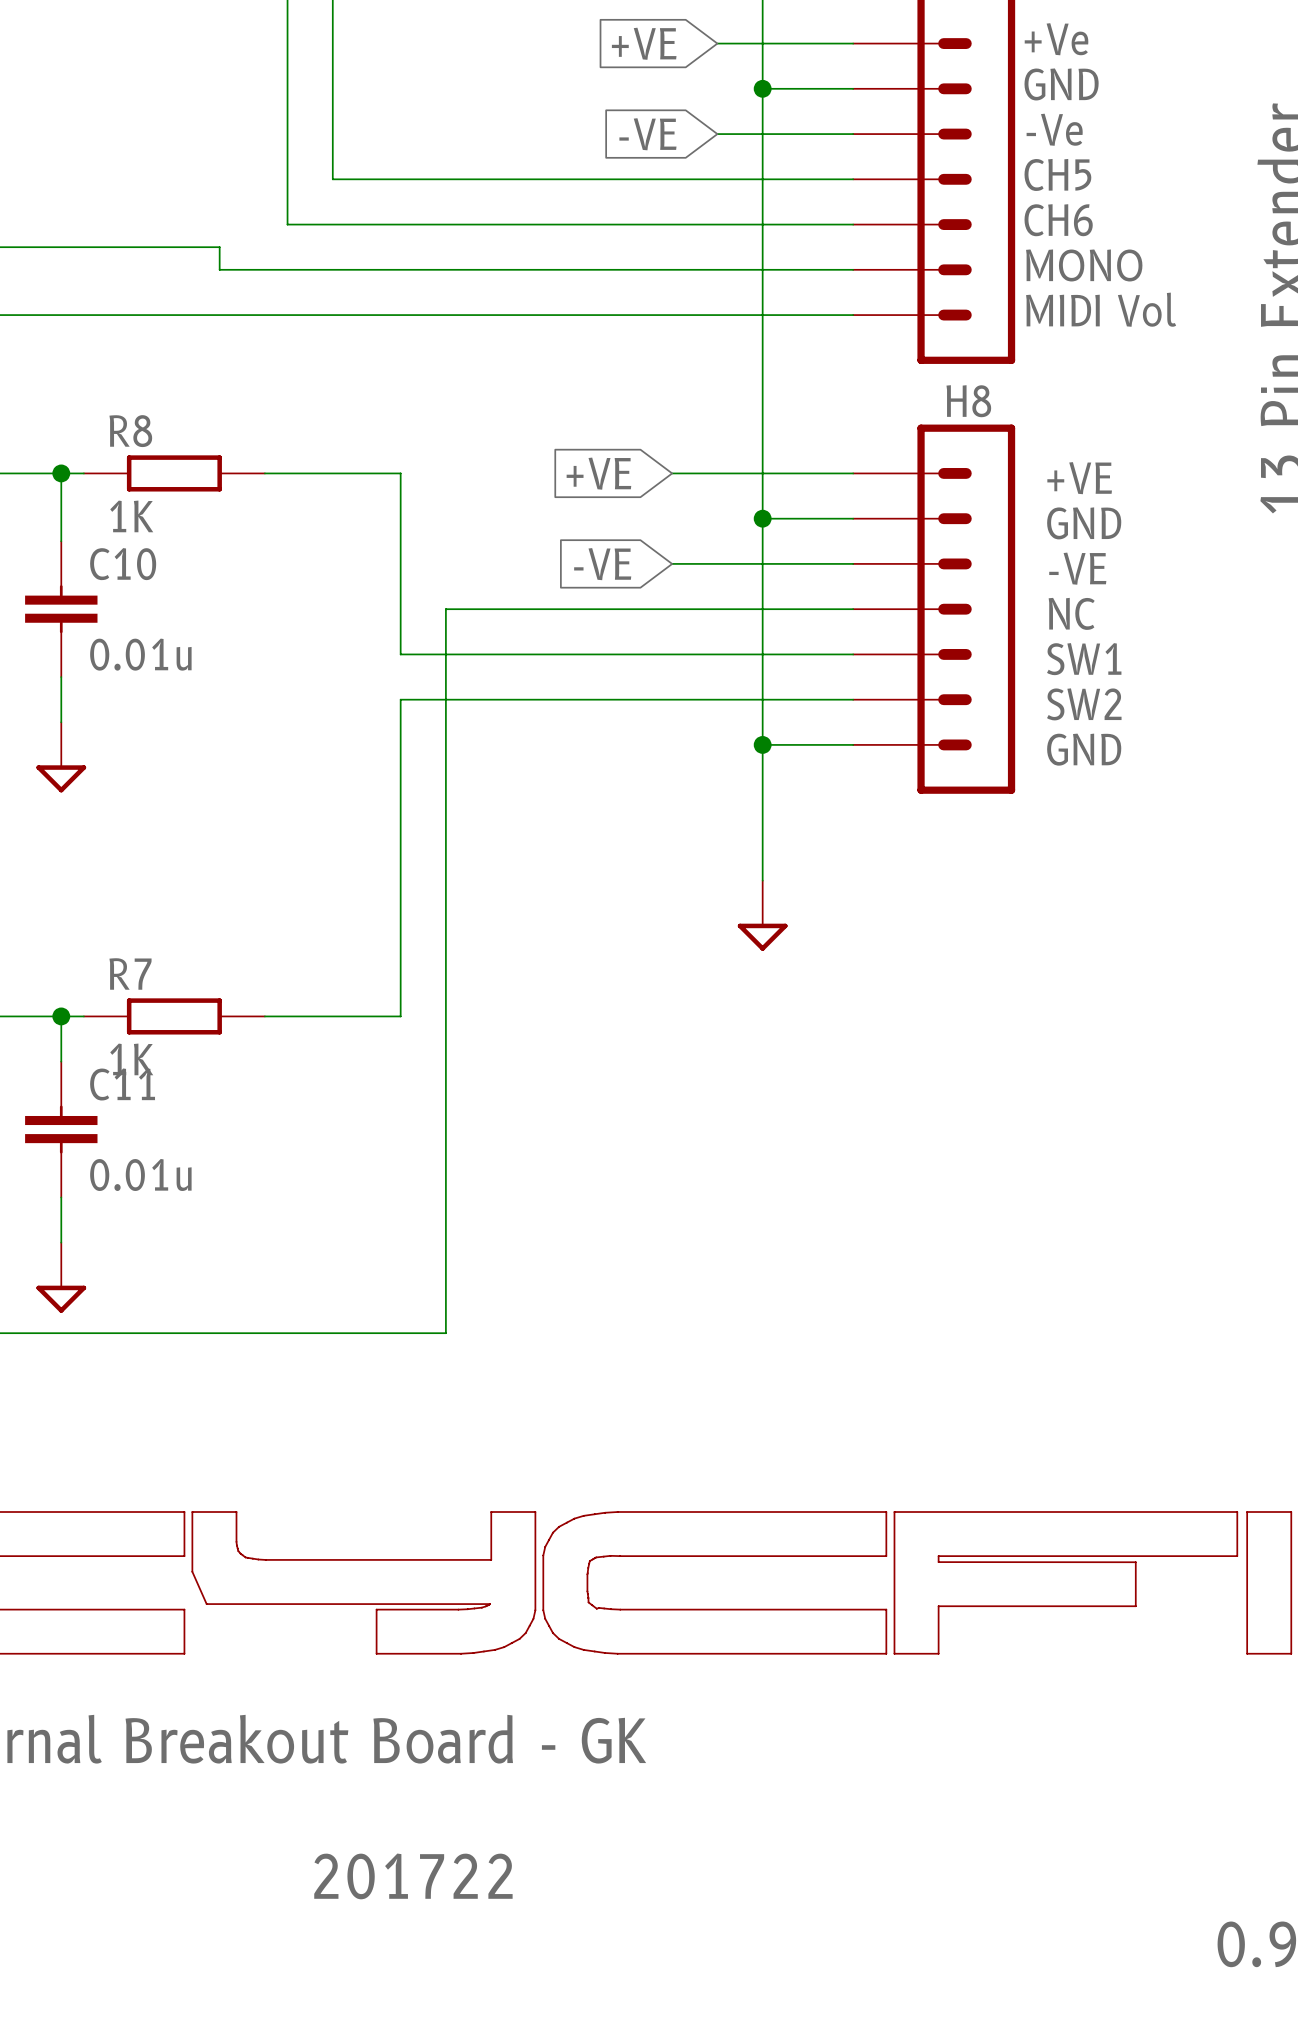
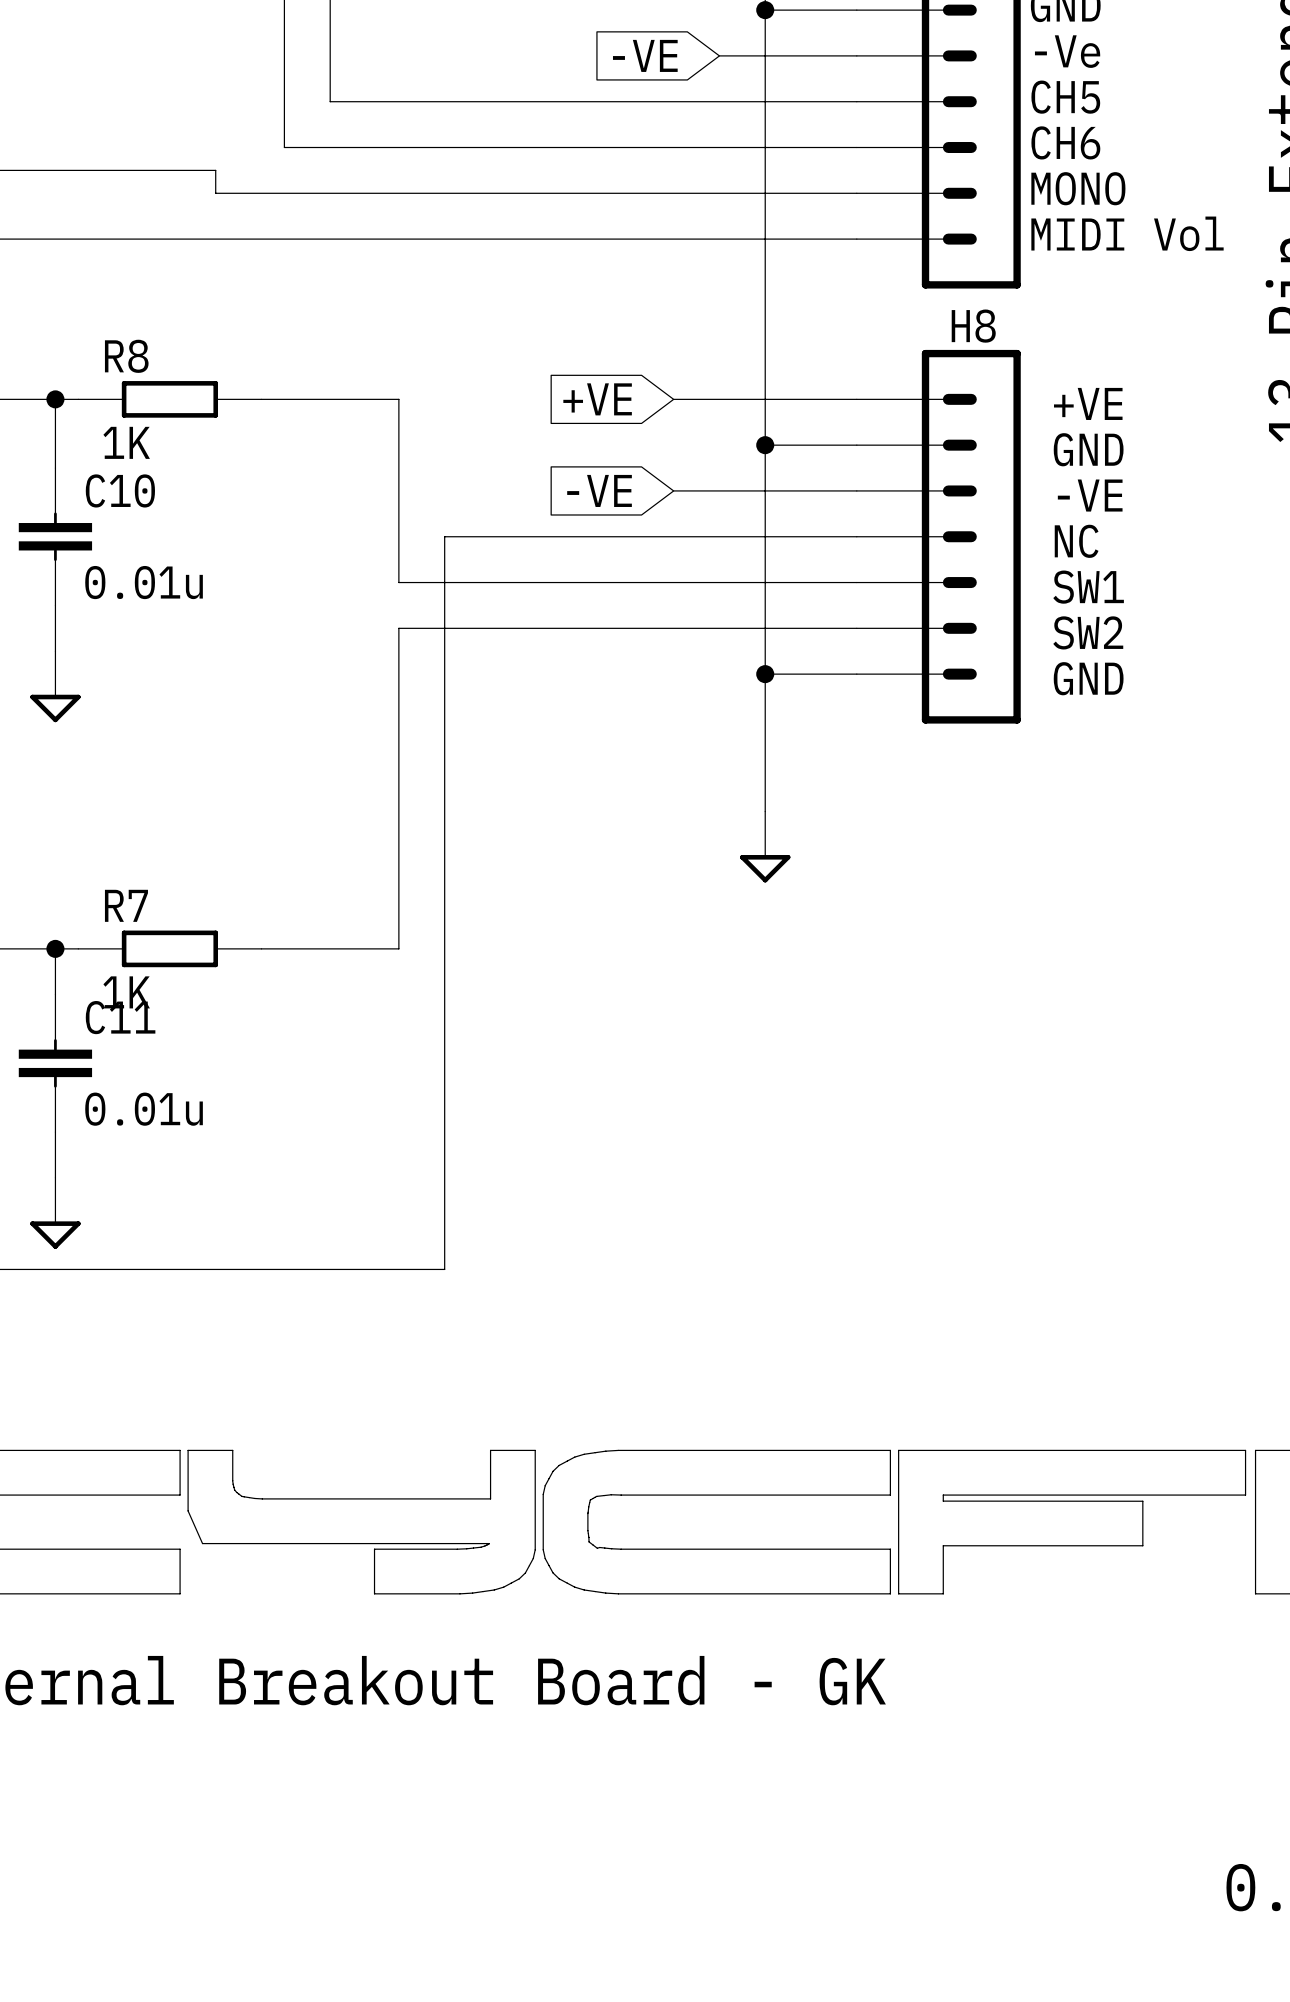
text: 201722 (413, 1876) -> none

